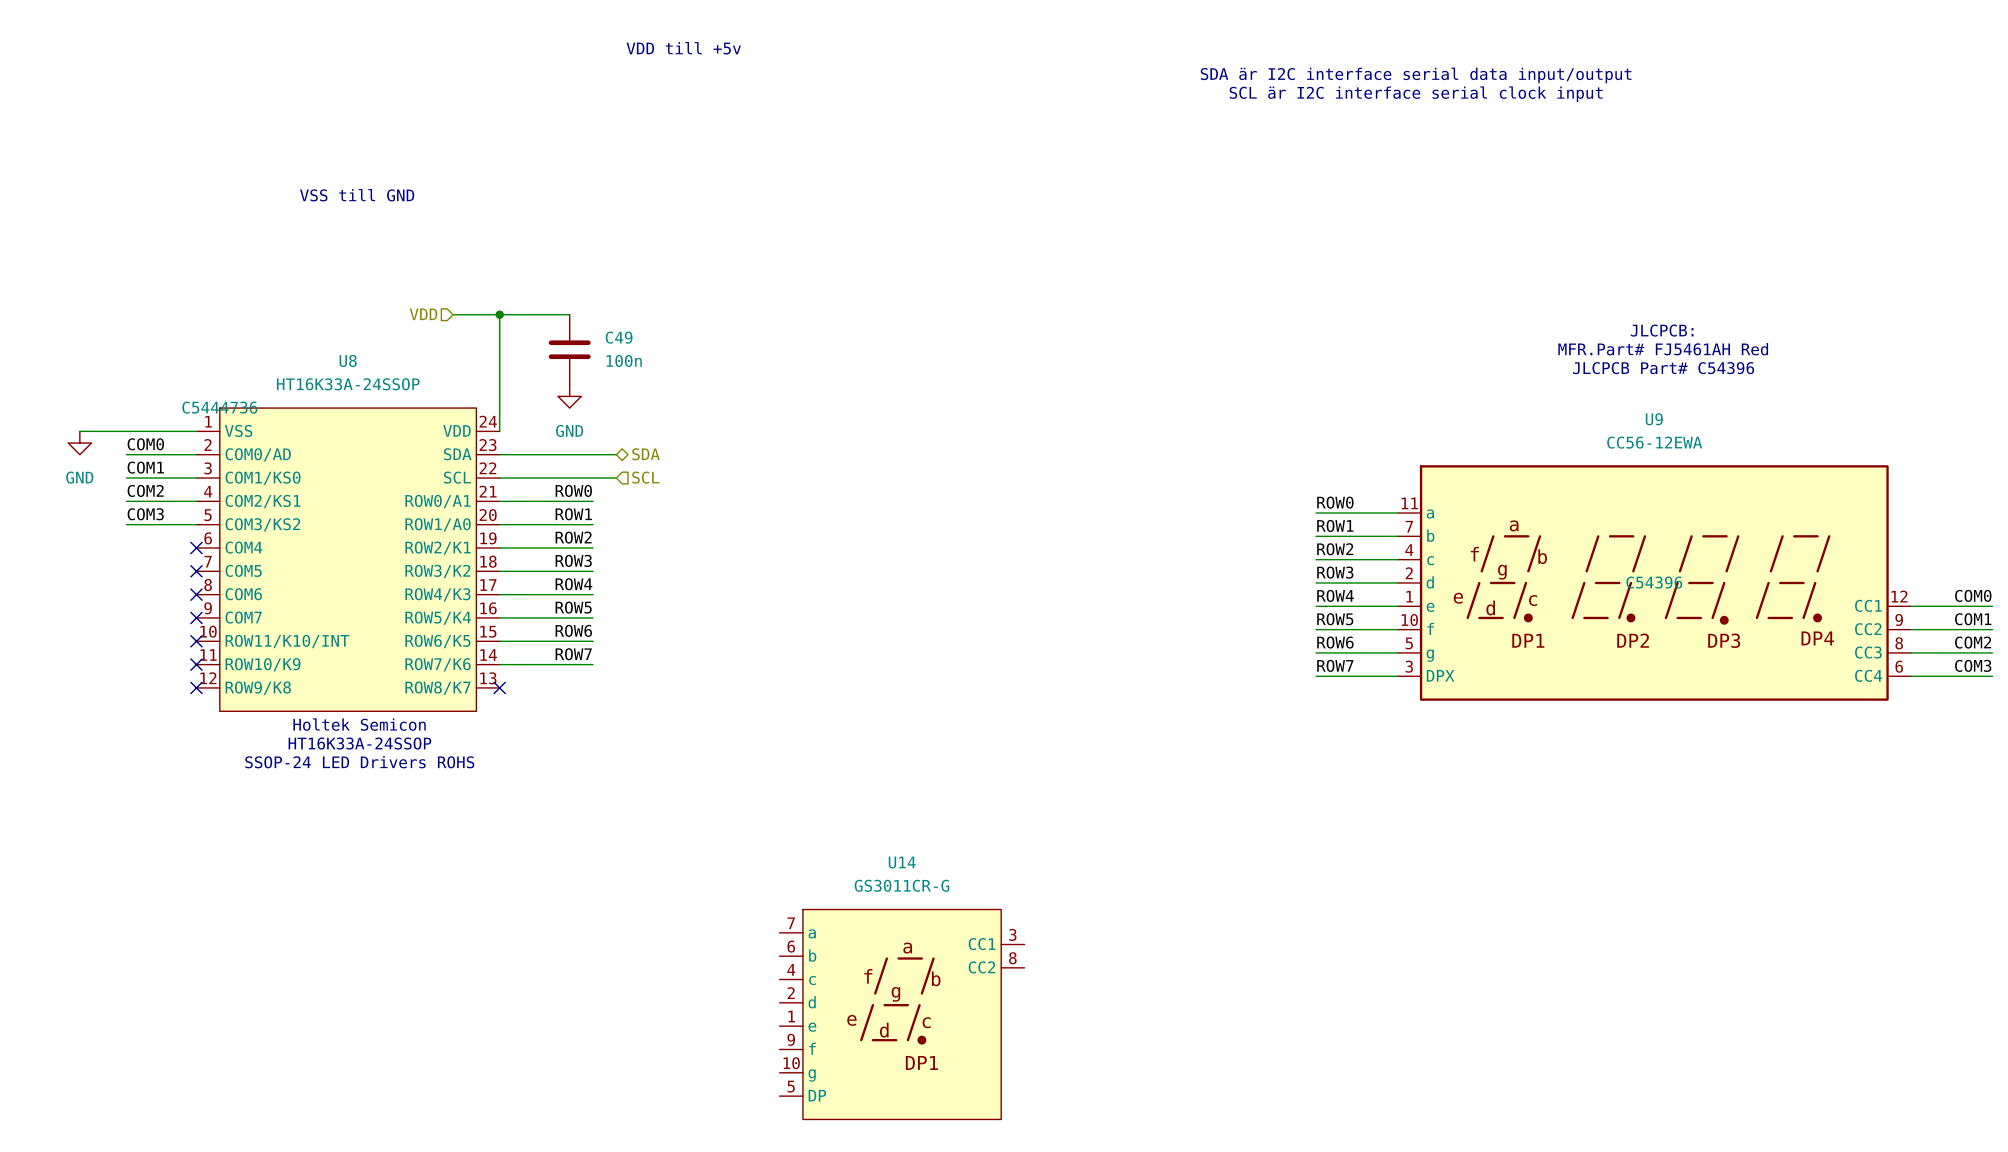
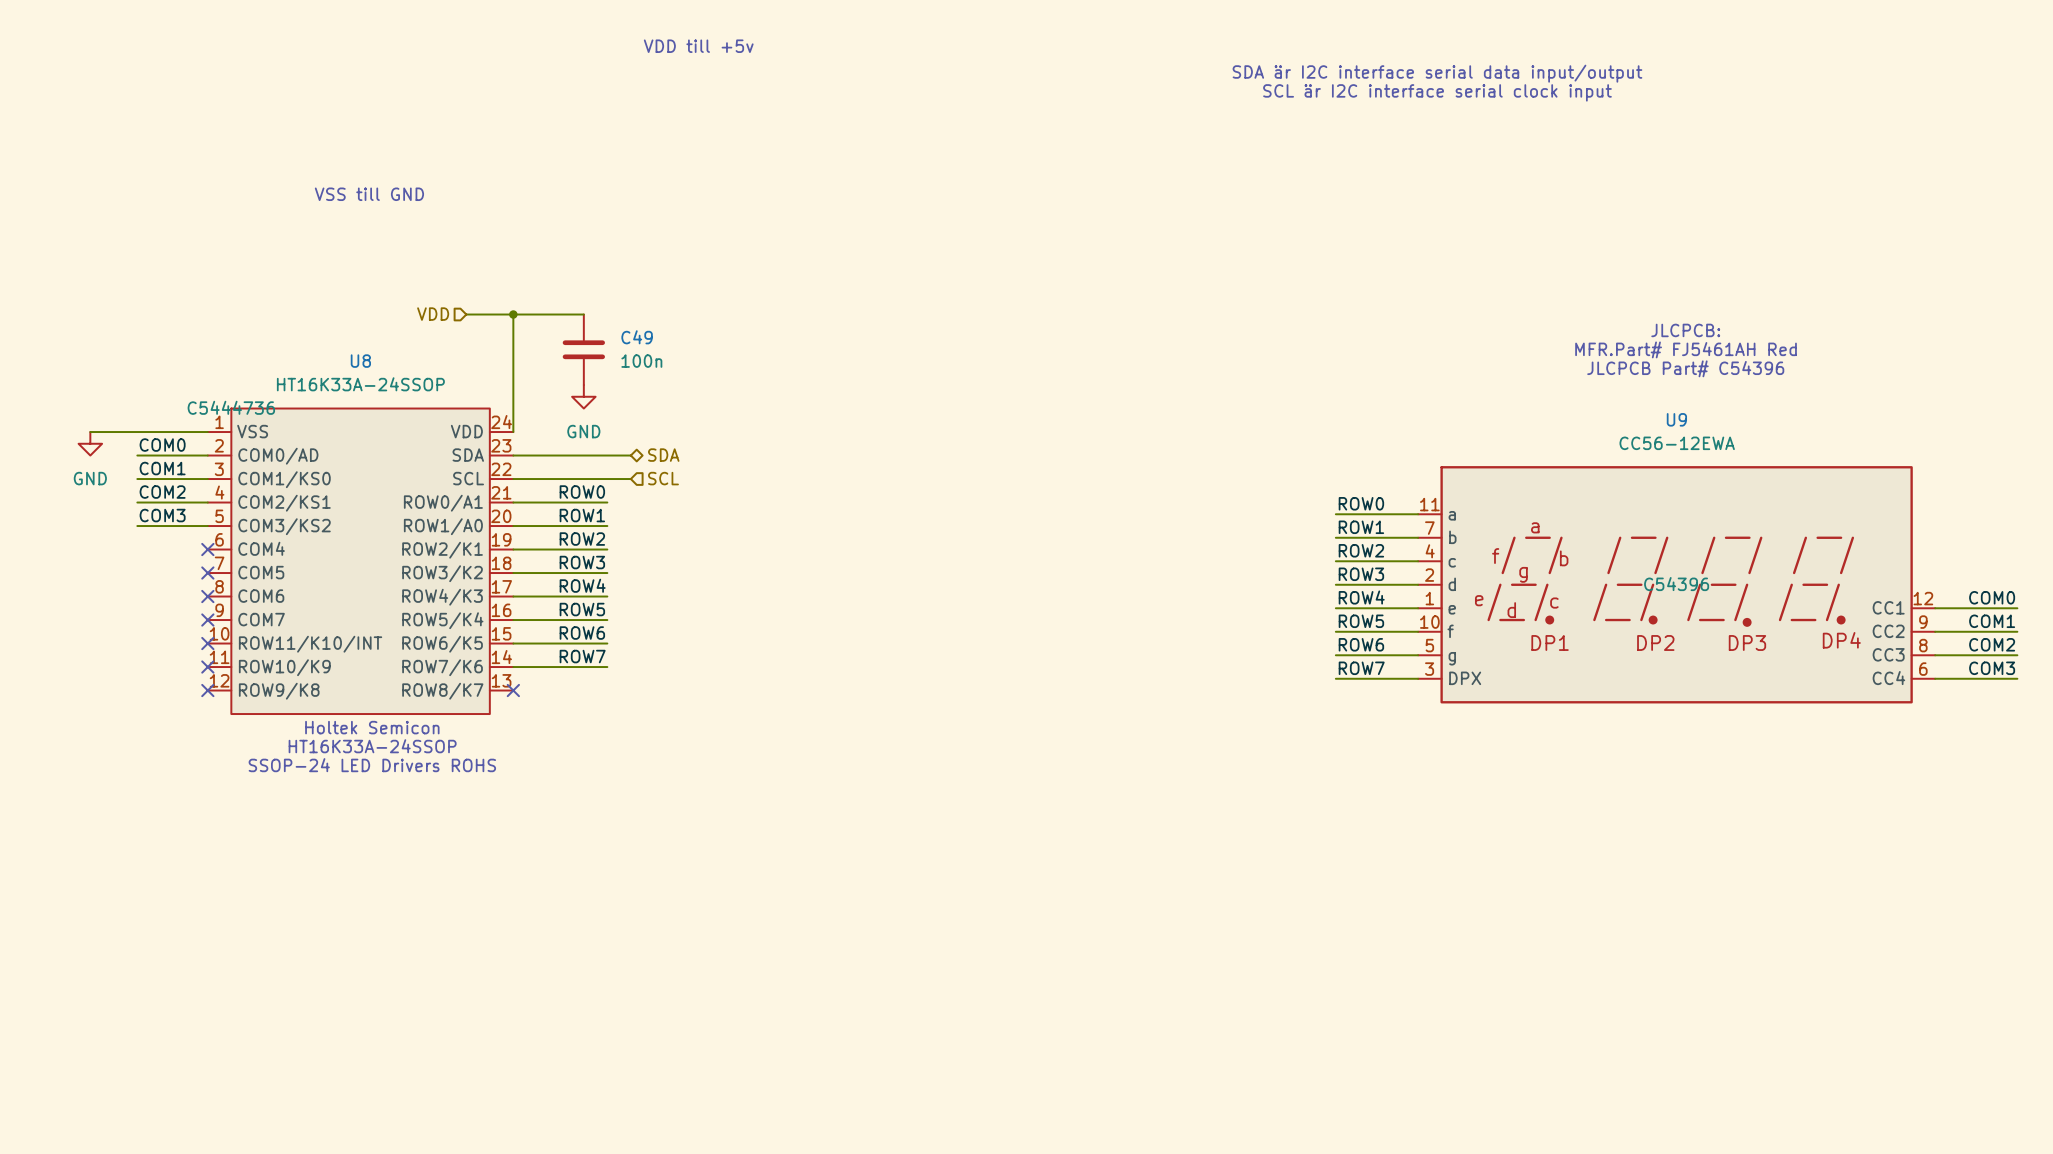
U14: GS3011CR-G (902, 1014) -> none

